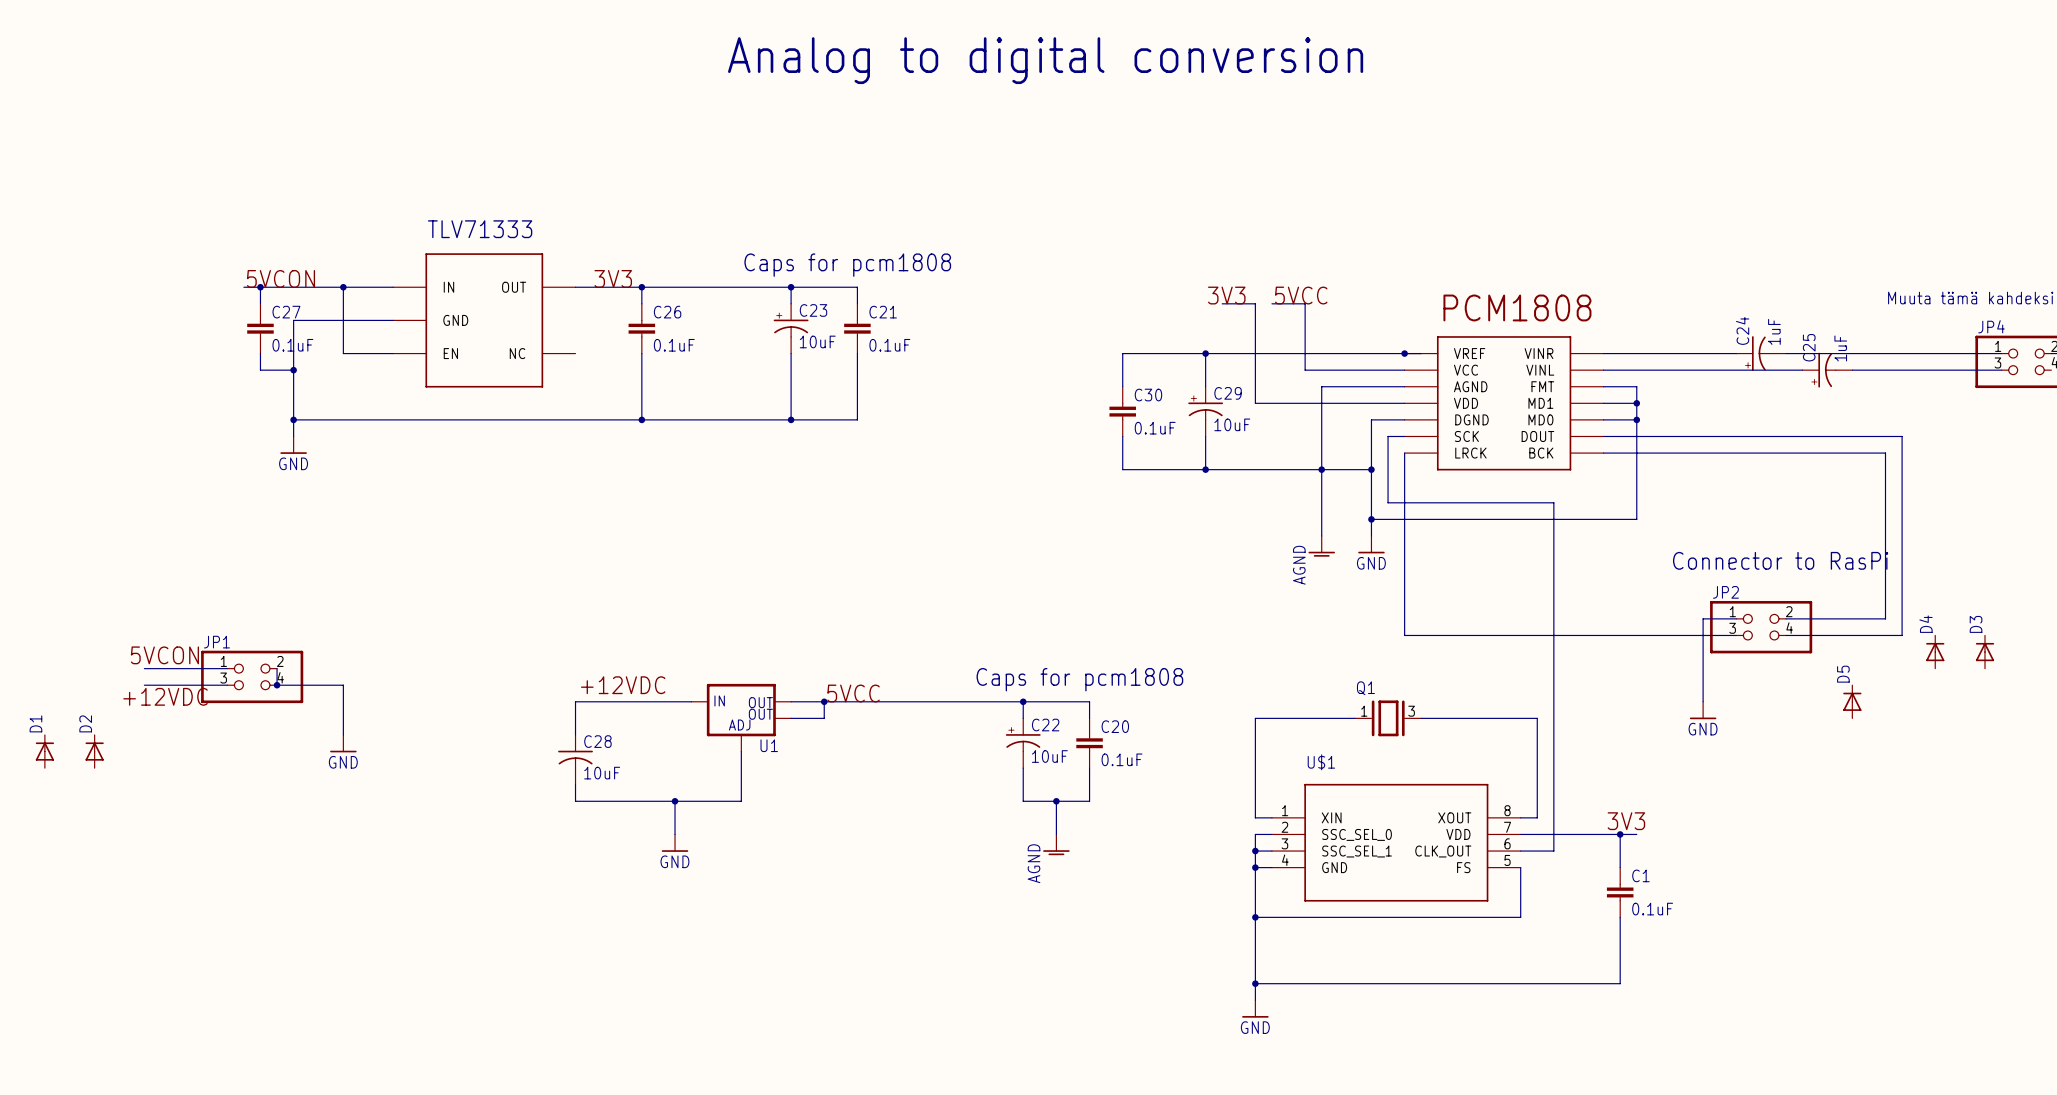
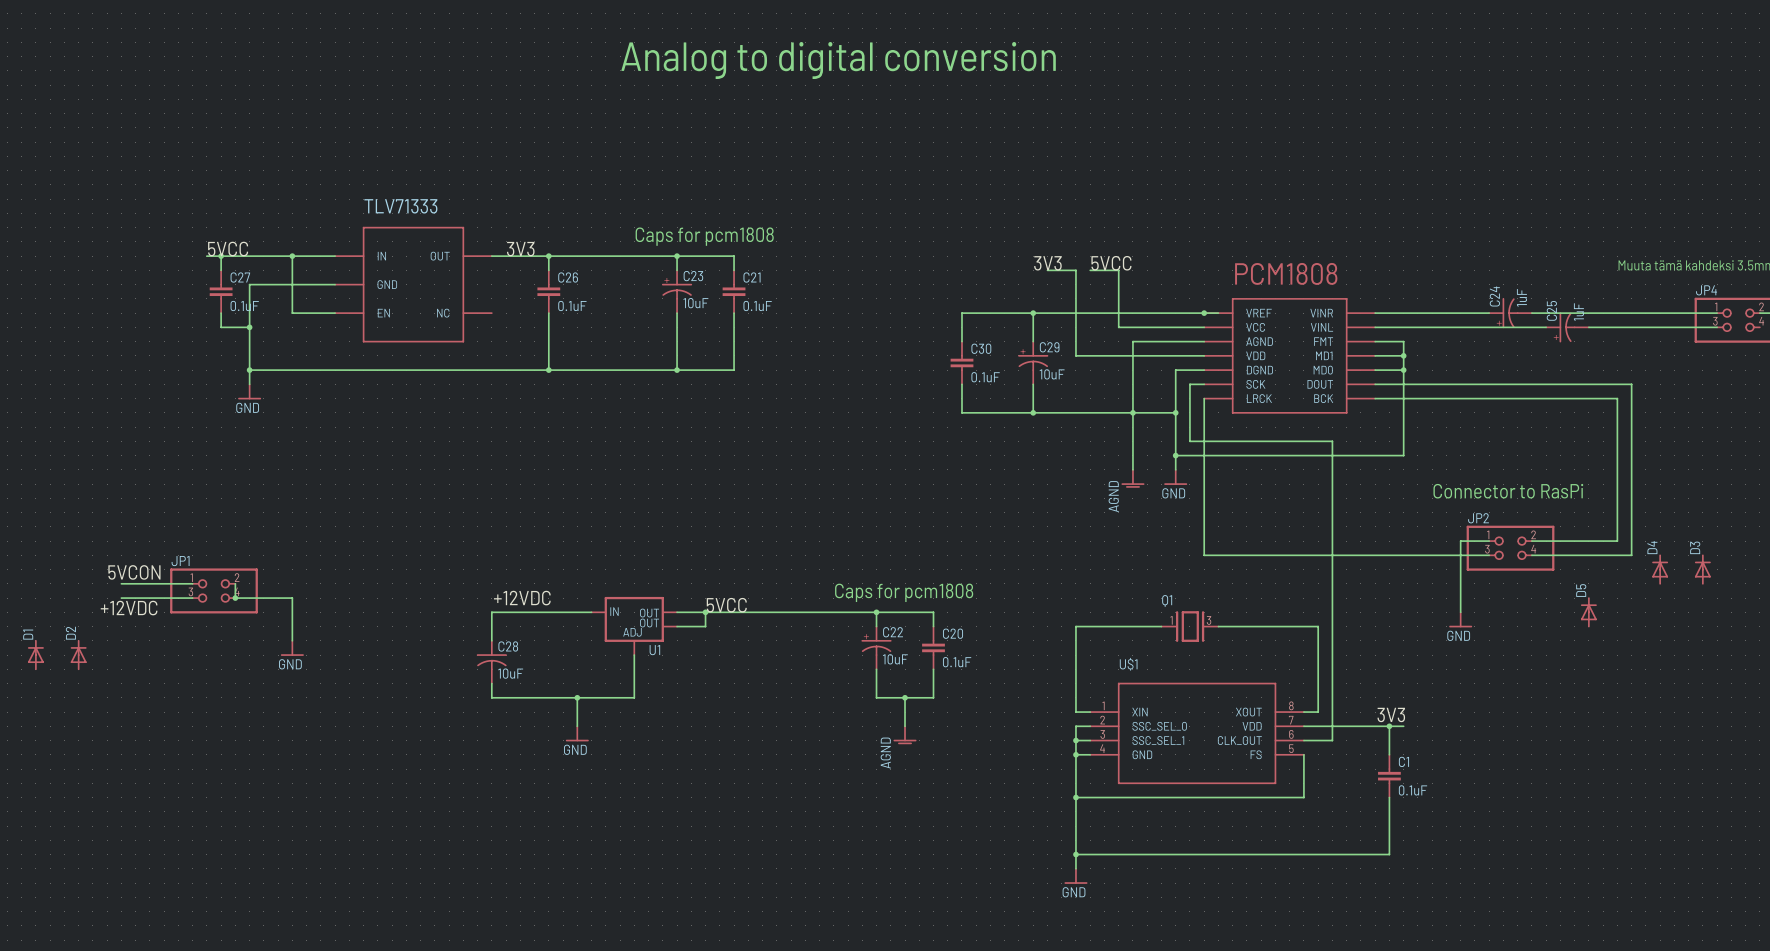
label: 5VCON (280, 278) -> 5VCC (228, 249)

